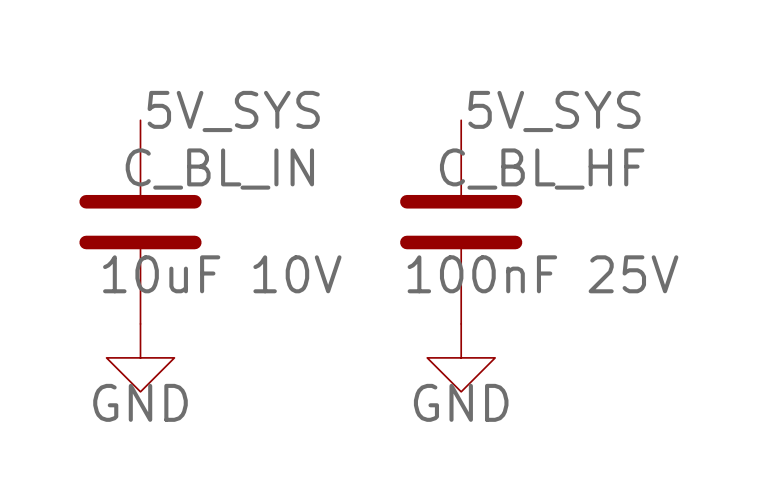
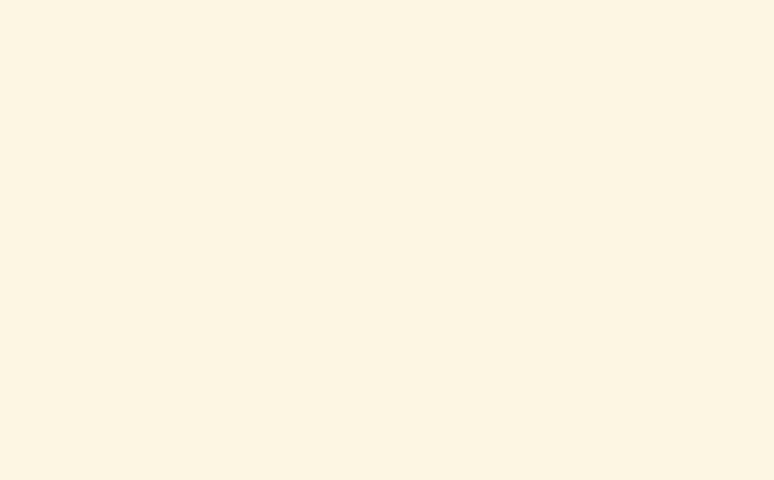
label: 5V_SYS (233, 111) -> none
label: 5V_SYS (554, 111) -> none
C_BL_IN: 10uF 10V (140, 222) -> none
C_BL_HF: 100nF 25V (461, 222) -> none
power symbol: GND (140, 357) -> none
power symbol: GND (461, 357) -> none

